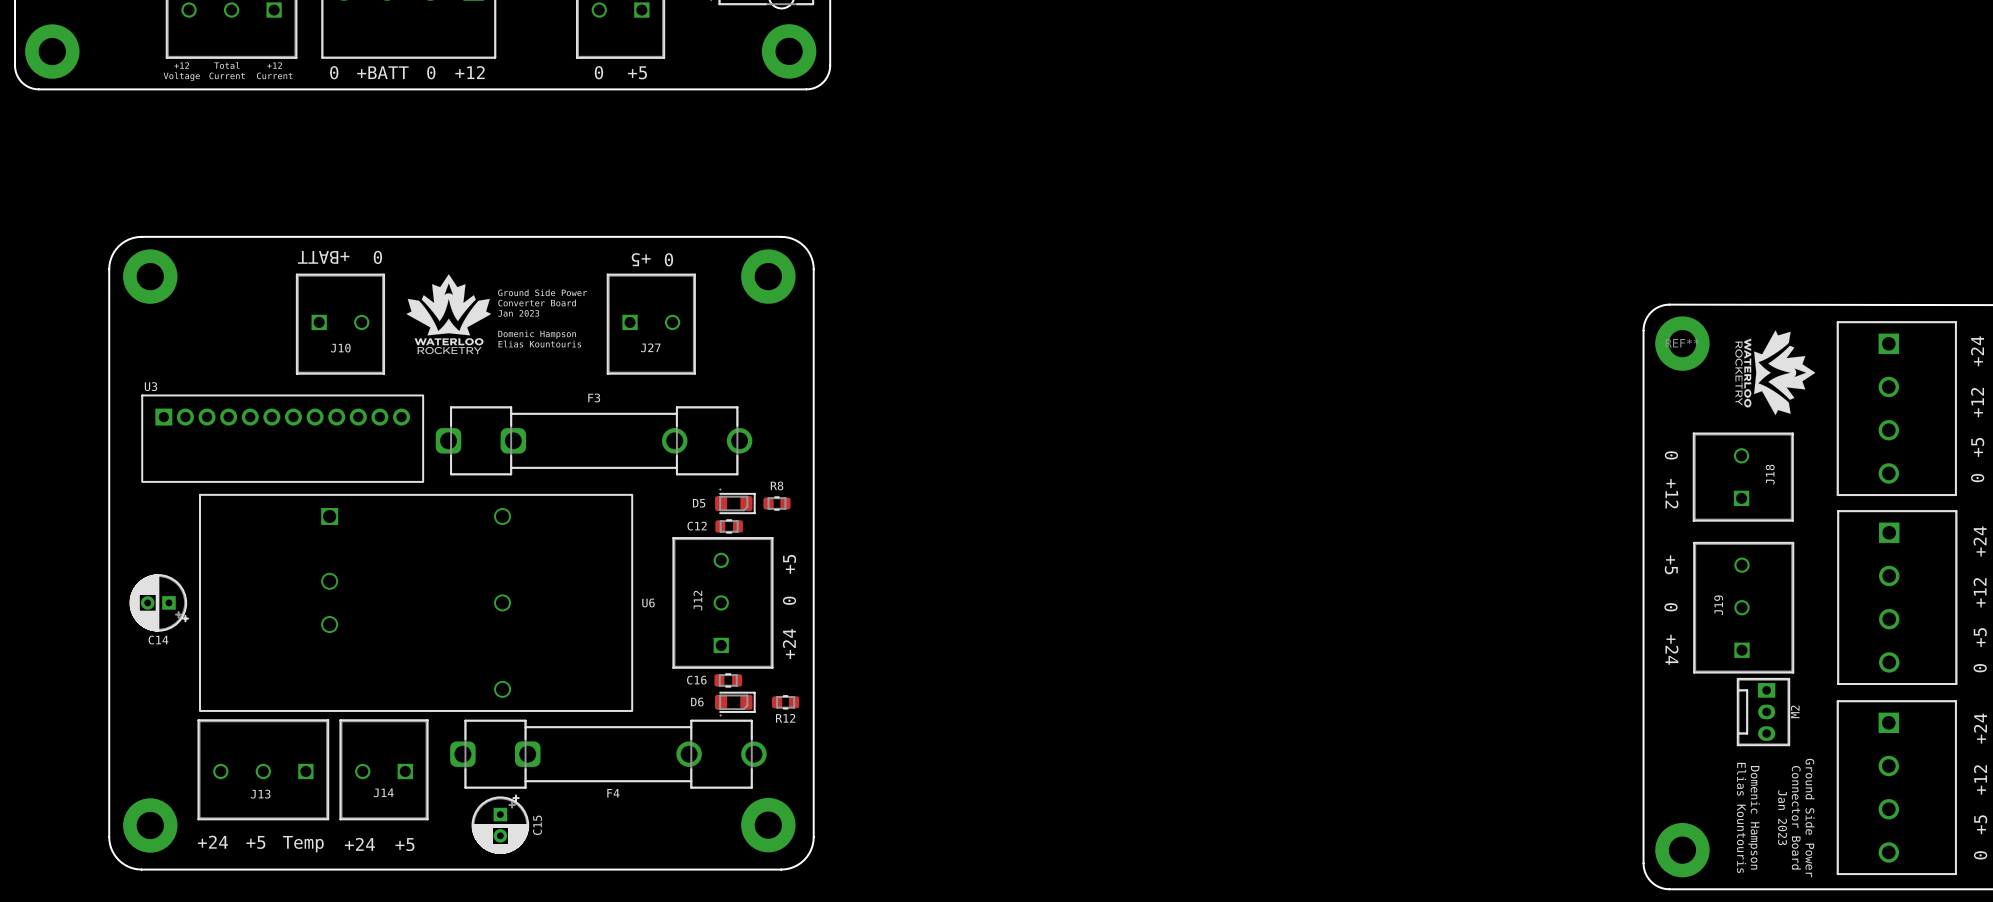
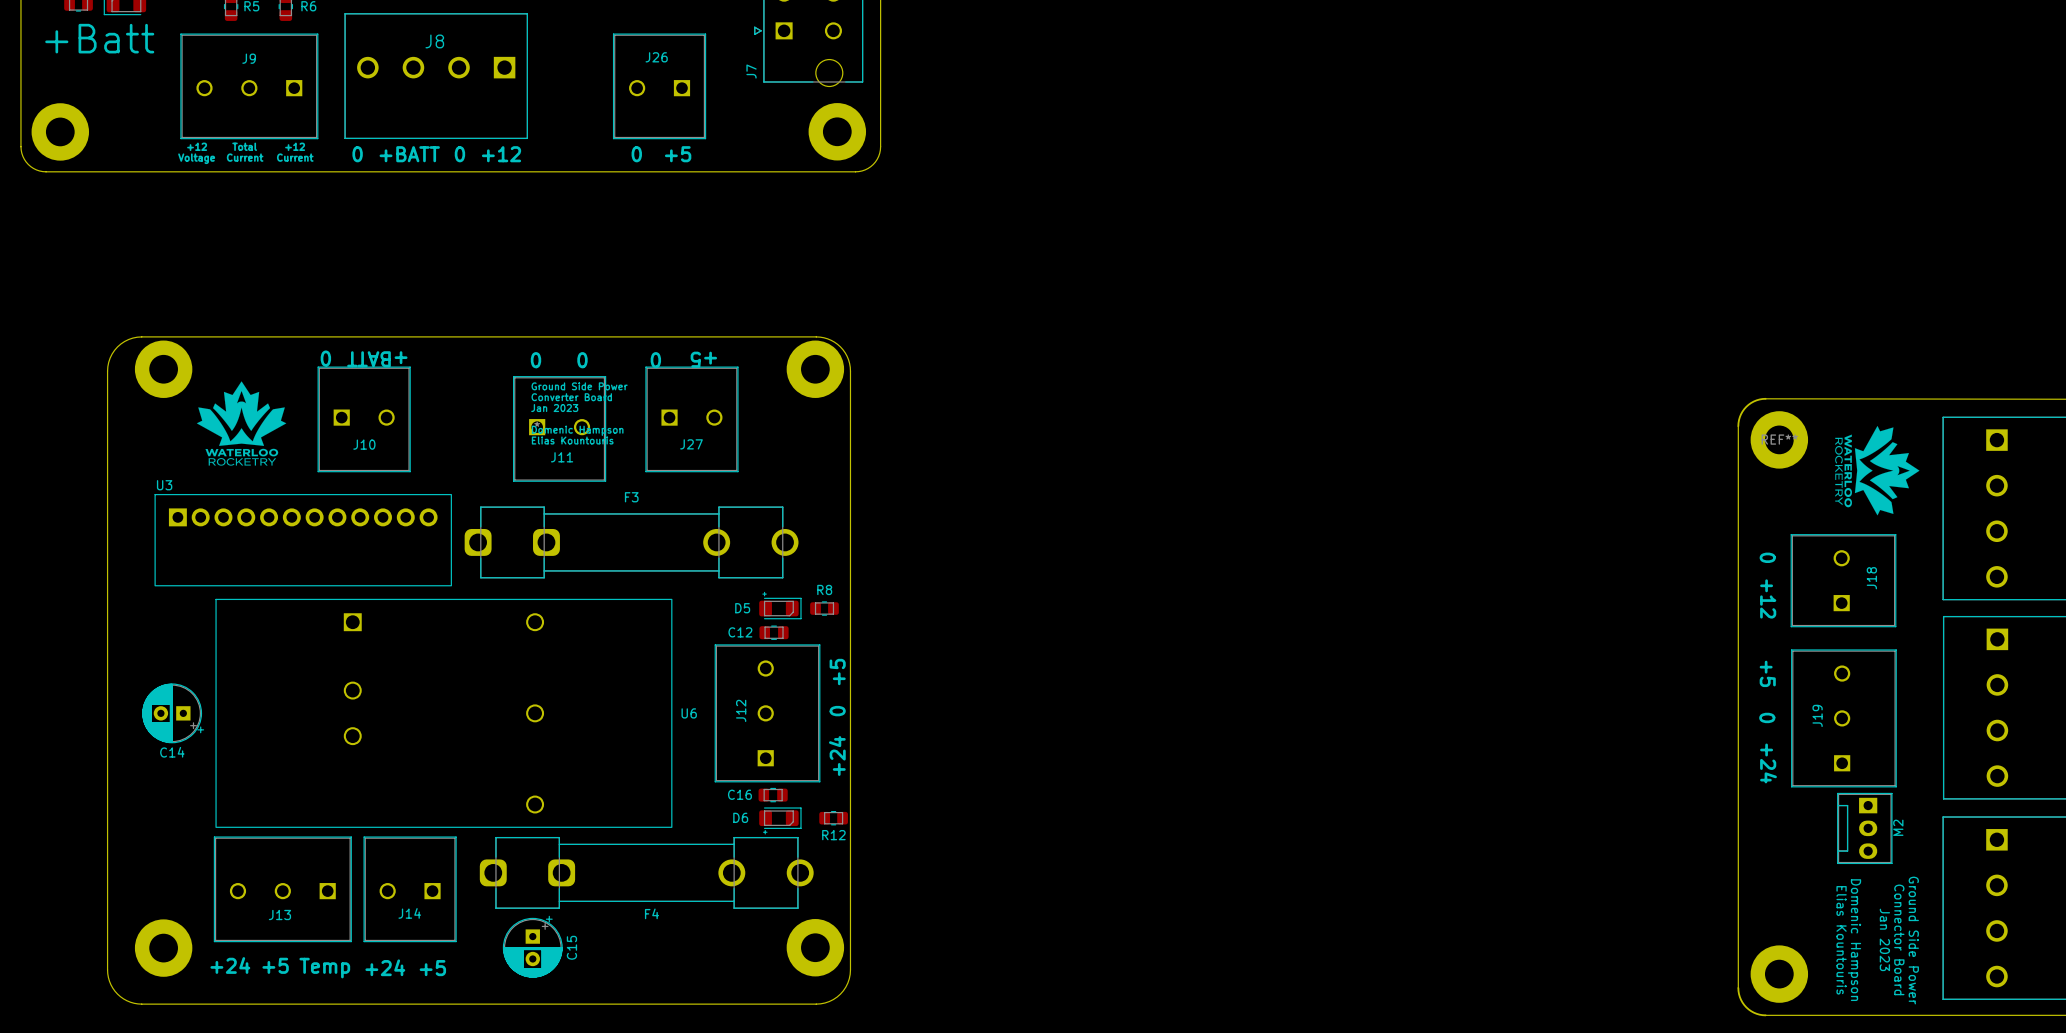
board edge: (141, 236) (781, 236) (792, 238) (804, 246) (811, 258) (813, 269) (813, 837) (811, 849) (804, 860) (793, 867) (781, 869) (141, 869) (130, 867) (118, 860) (111, 847) (109, 837) (109, 269) (111, 256) (118, 246) (129, 239) (141, 236) -> (141, 336) (816, 336) (831, 340) (840, 346) (847, 356) (850, 371) (850, 969) (847, 983) (840, 994) (829, 1001) (816, 1004) (141, 1004) (130, 1002) (117, 994) (110, 984) (107, 969) (107, 371) (110, 358) (117, 346) (128, 339) (141, 336)
text position: +BATT (323, 257) -> +BATT (377, 359)
text: 0 (377, 257) -> none
text position: +5 (641, 259) -> +5 (703, 359)
text position: 0 (668, 259) -> 0 (655, 360)
text: none -> 0 (325, 358)
text: none -> 0 (535, 360)
text: none -> 0 (582, 360)
drawing: [406, 274, 492, 355] -> none
drawing: none -> [196, 381, 287, 466]
J11: none -> (559, 428)

